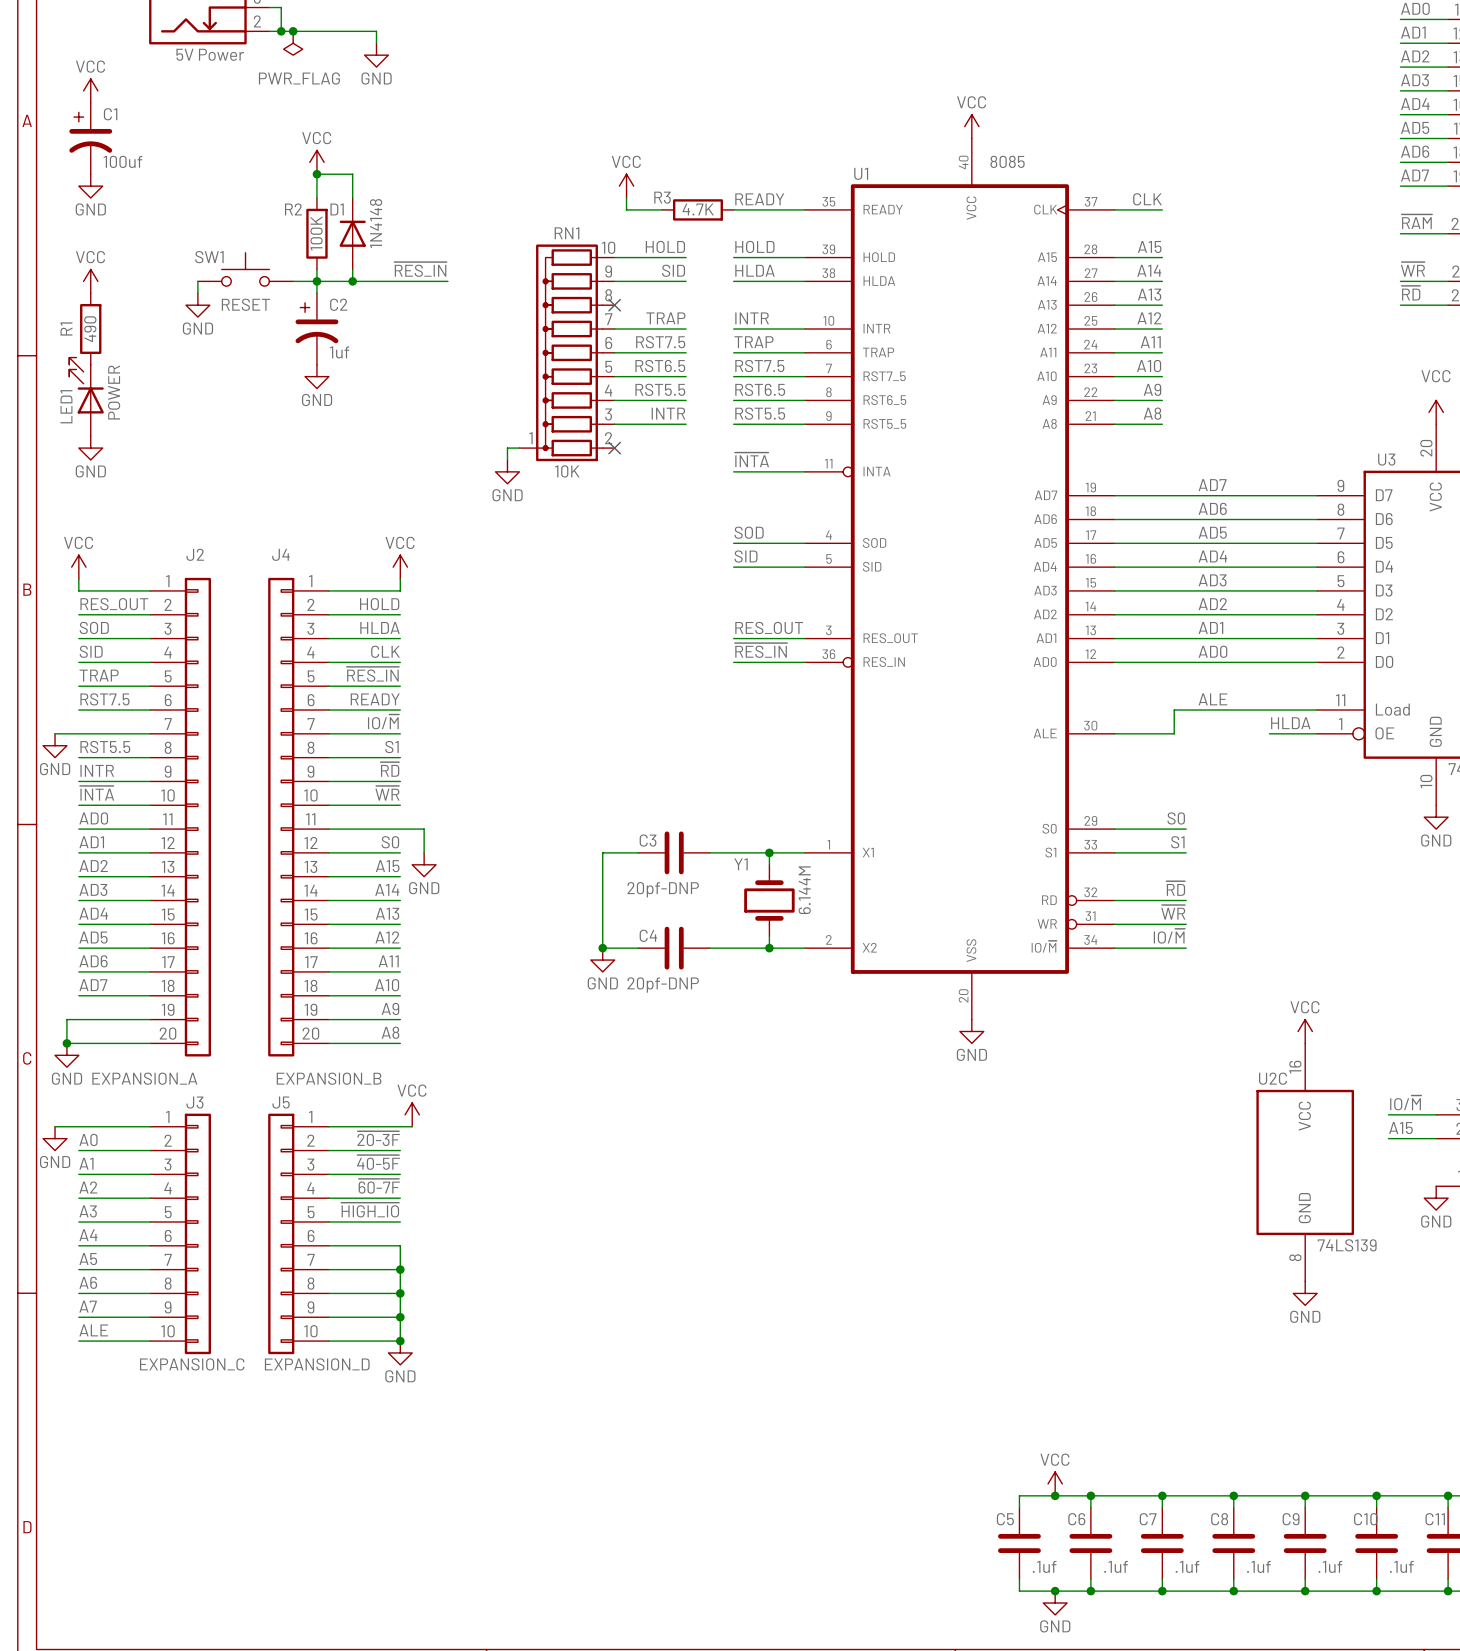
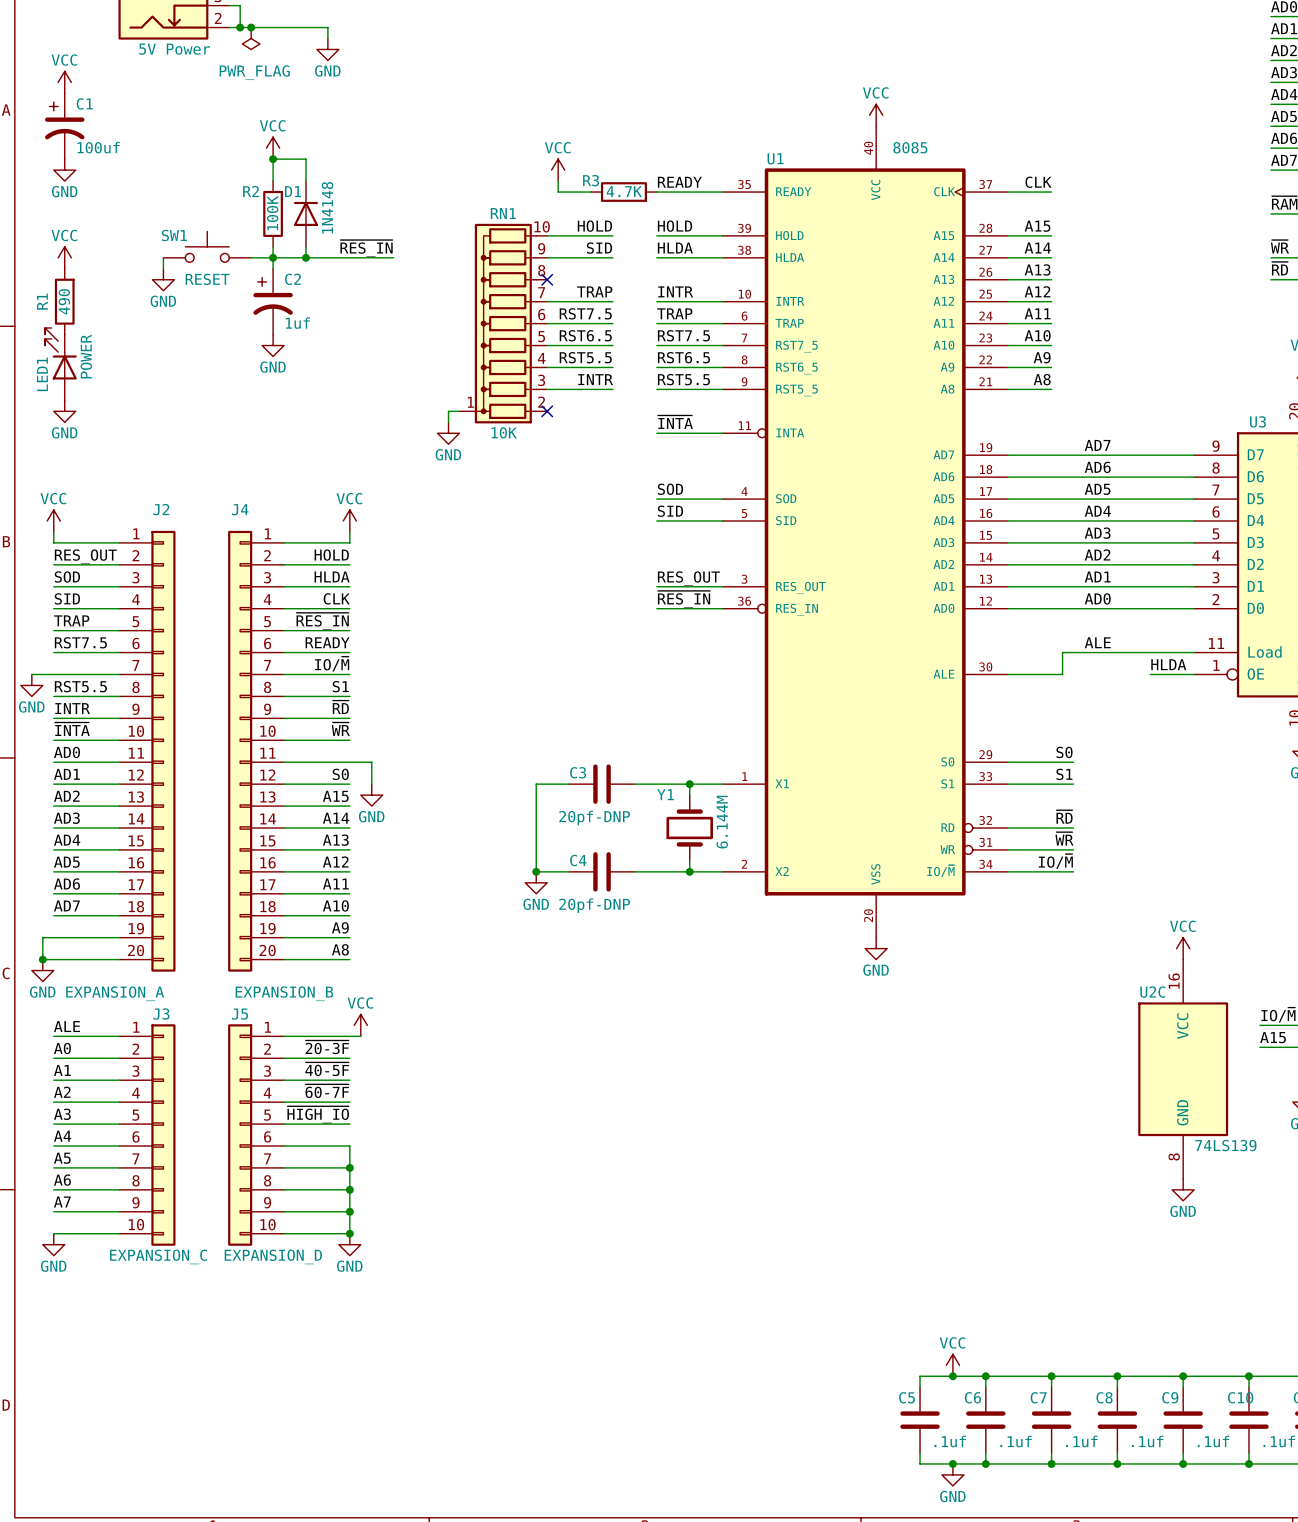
wire: (55, 1126) (78, 1126) -> none
power symbol position: GND (55, 1138) -> GND (53, 1244)
label position: ALE (93, 1330) -> ALE (67, 1026)

